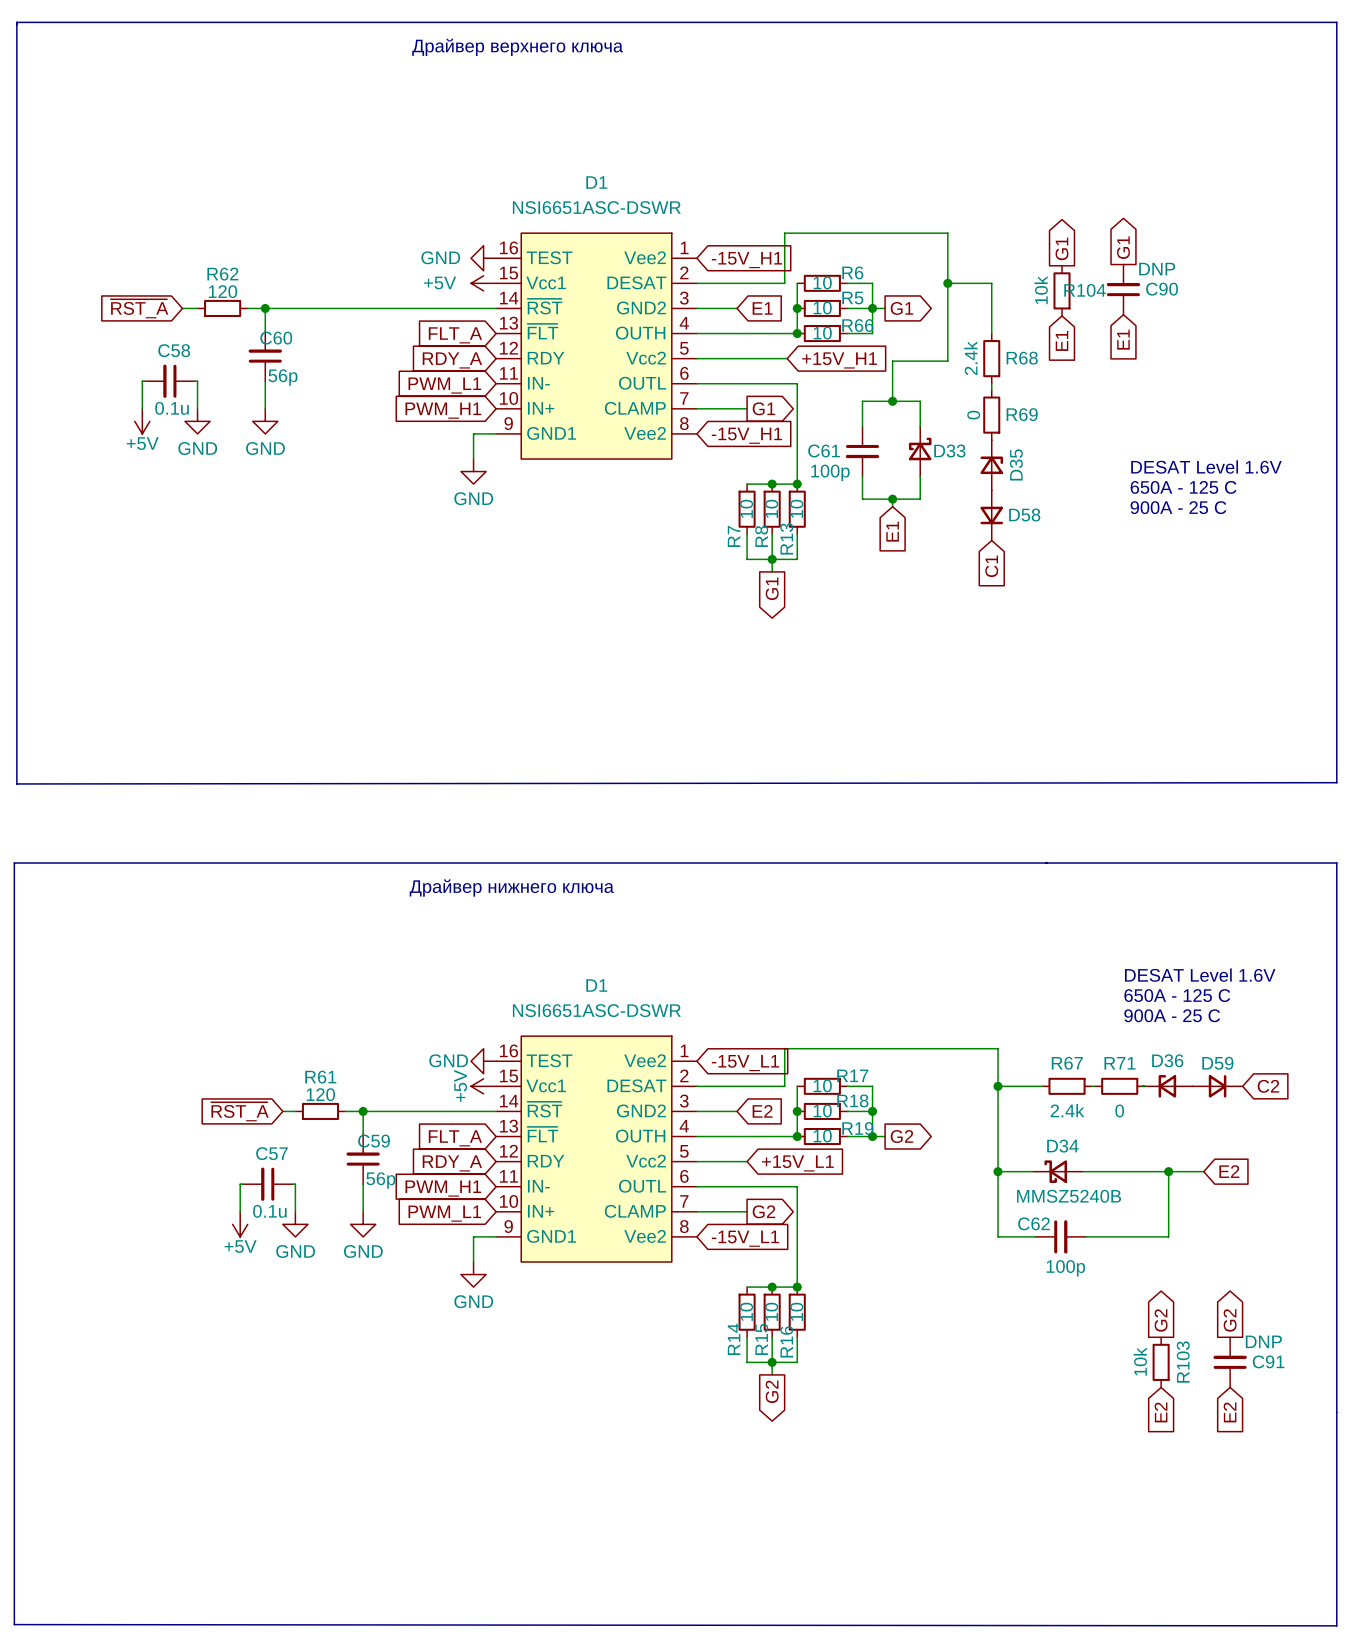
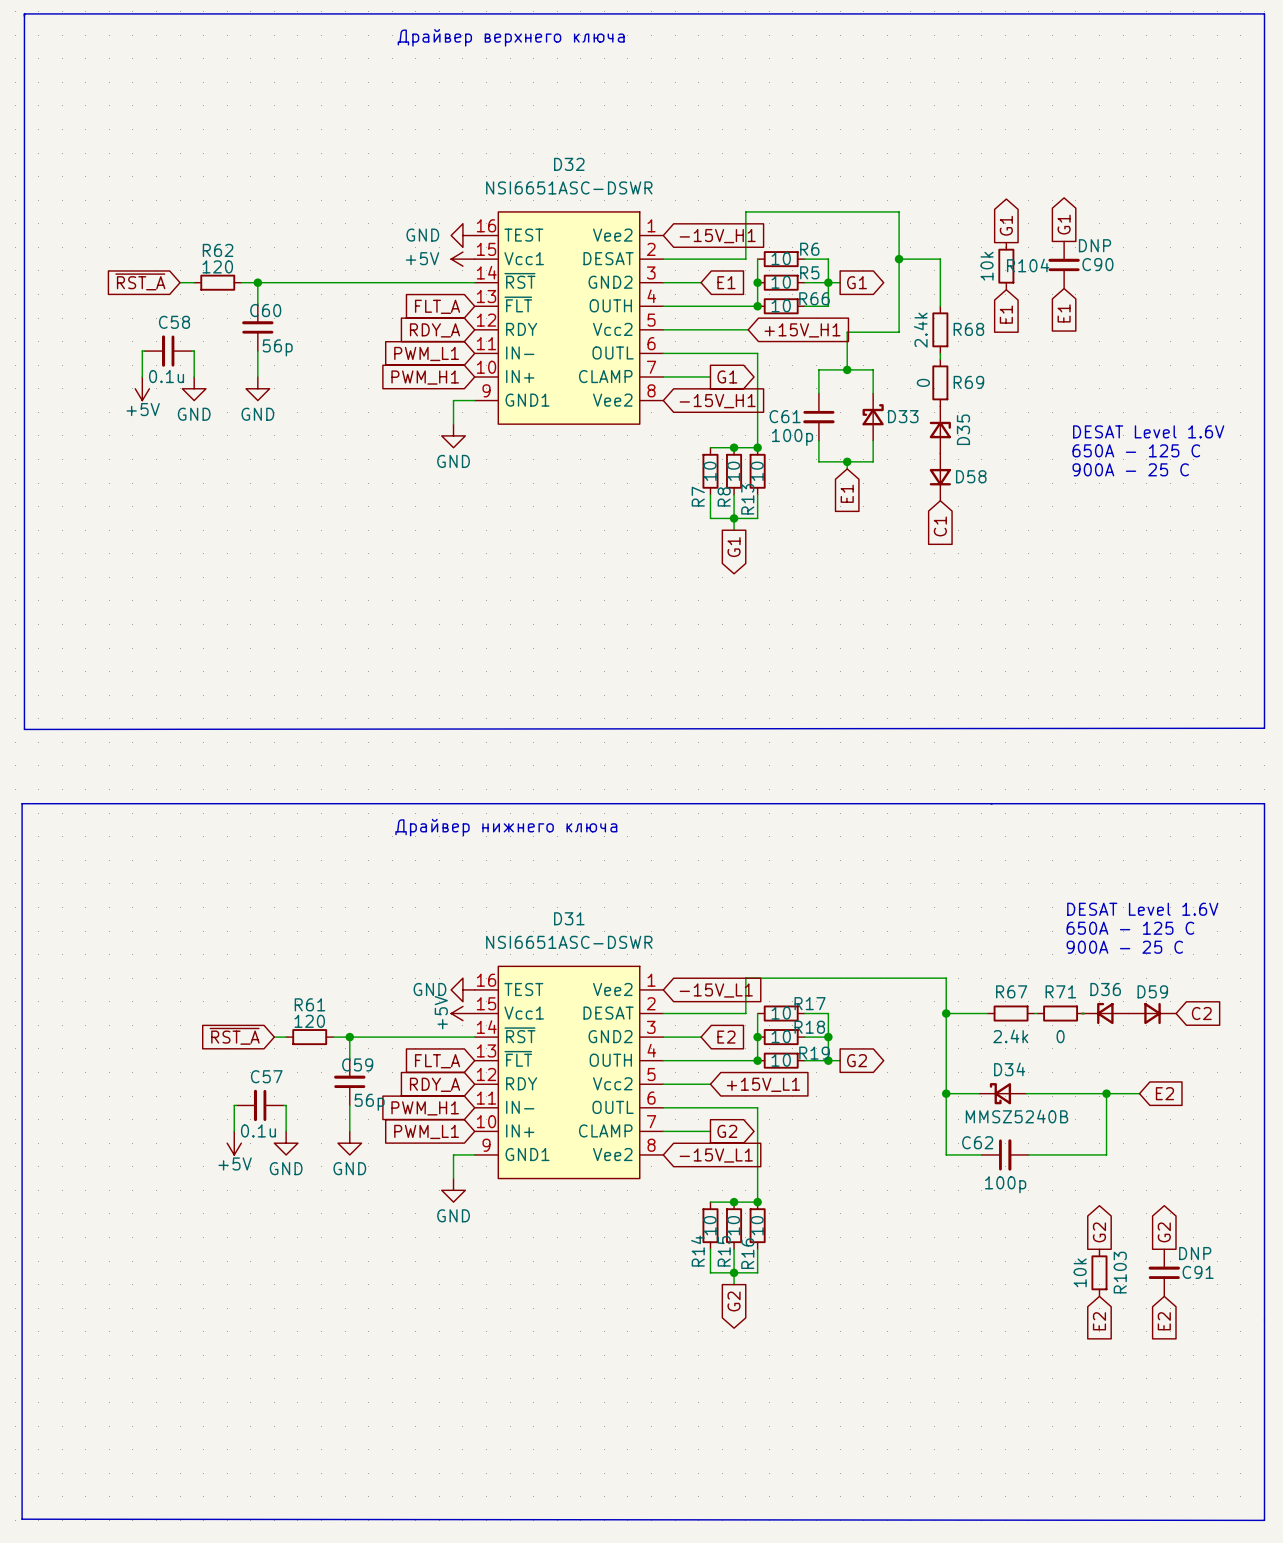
D1 name: D1 (596, 182) -> D32 (569, 164)
D1 name: D1 (596, 985) -> D31 (569, 918)

